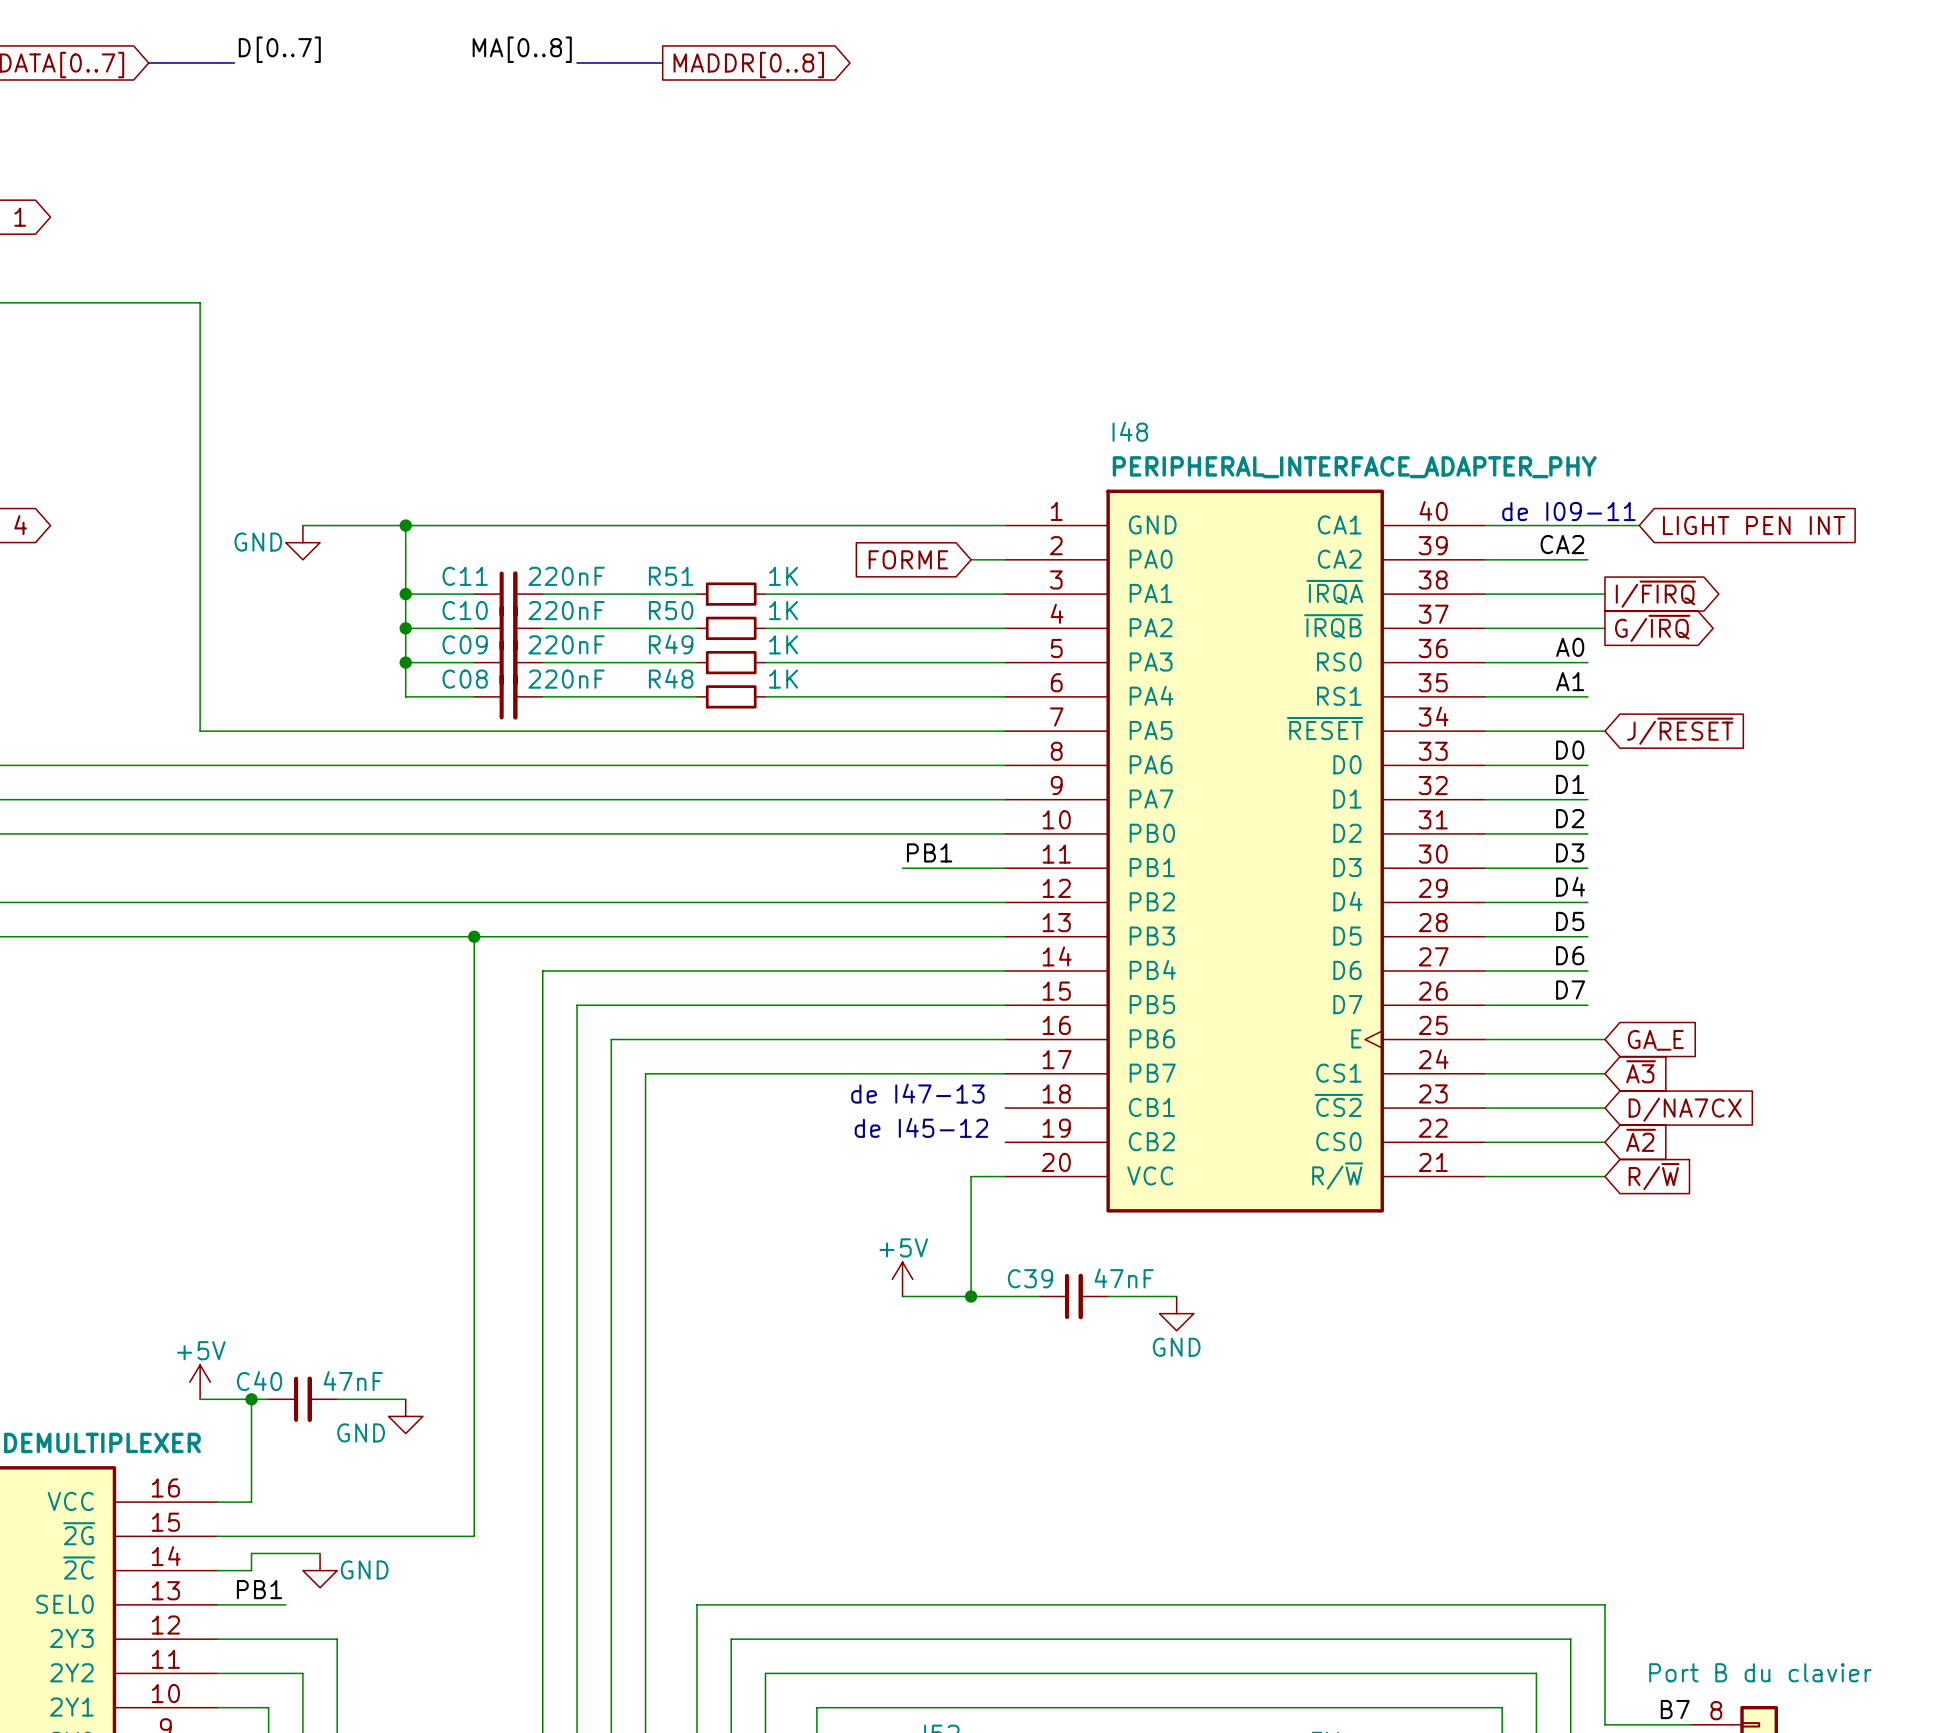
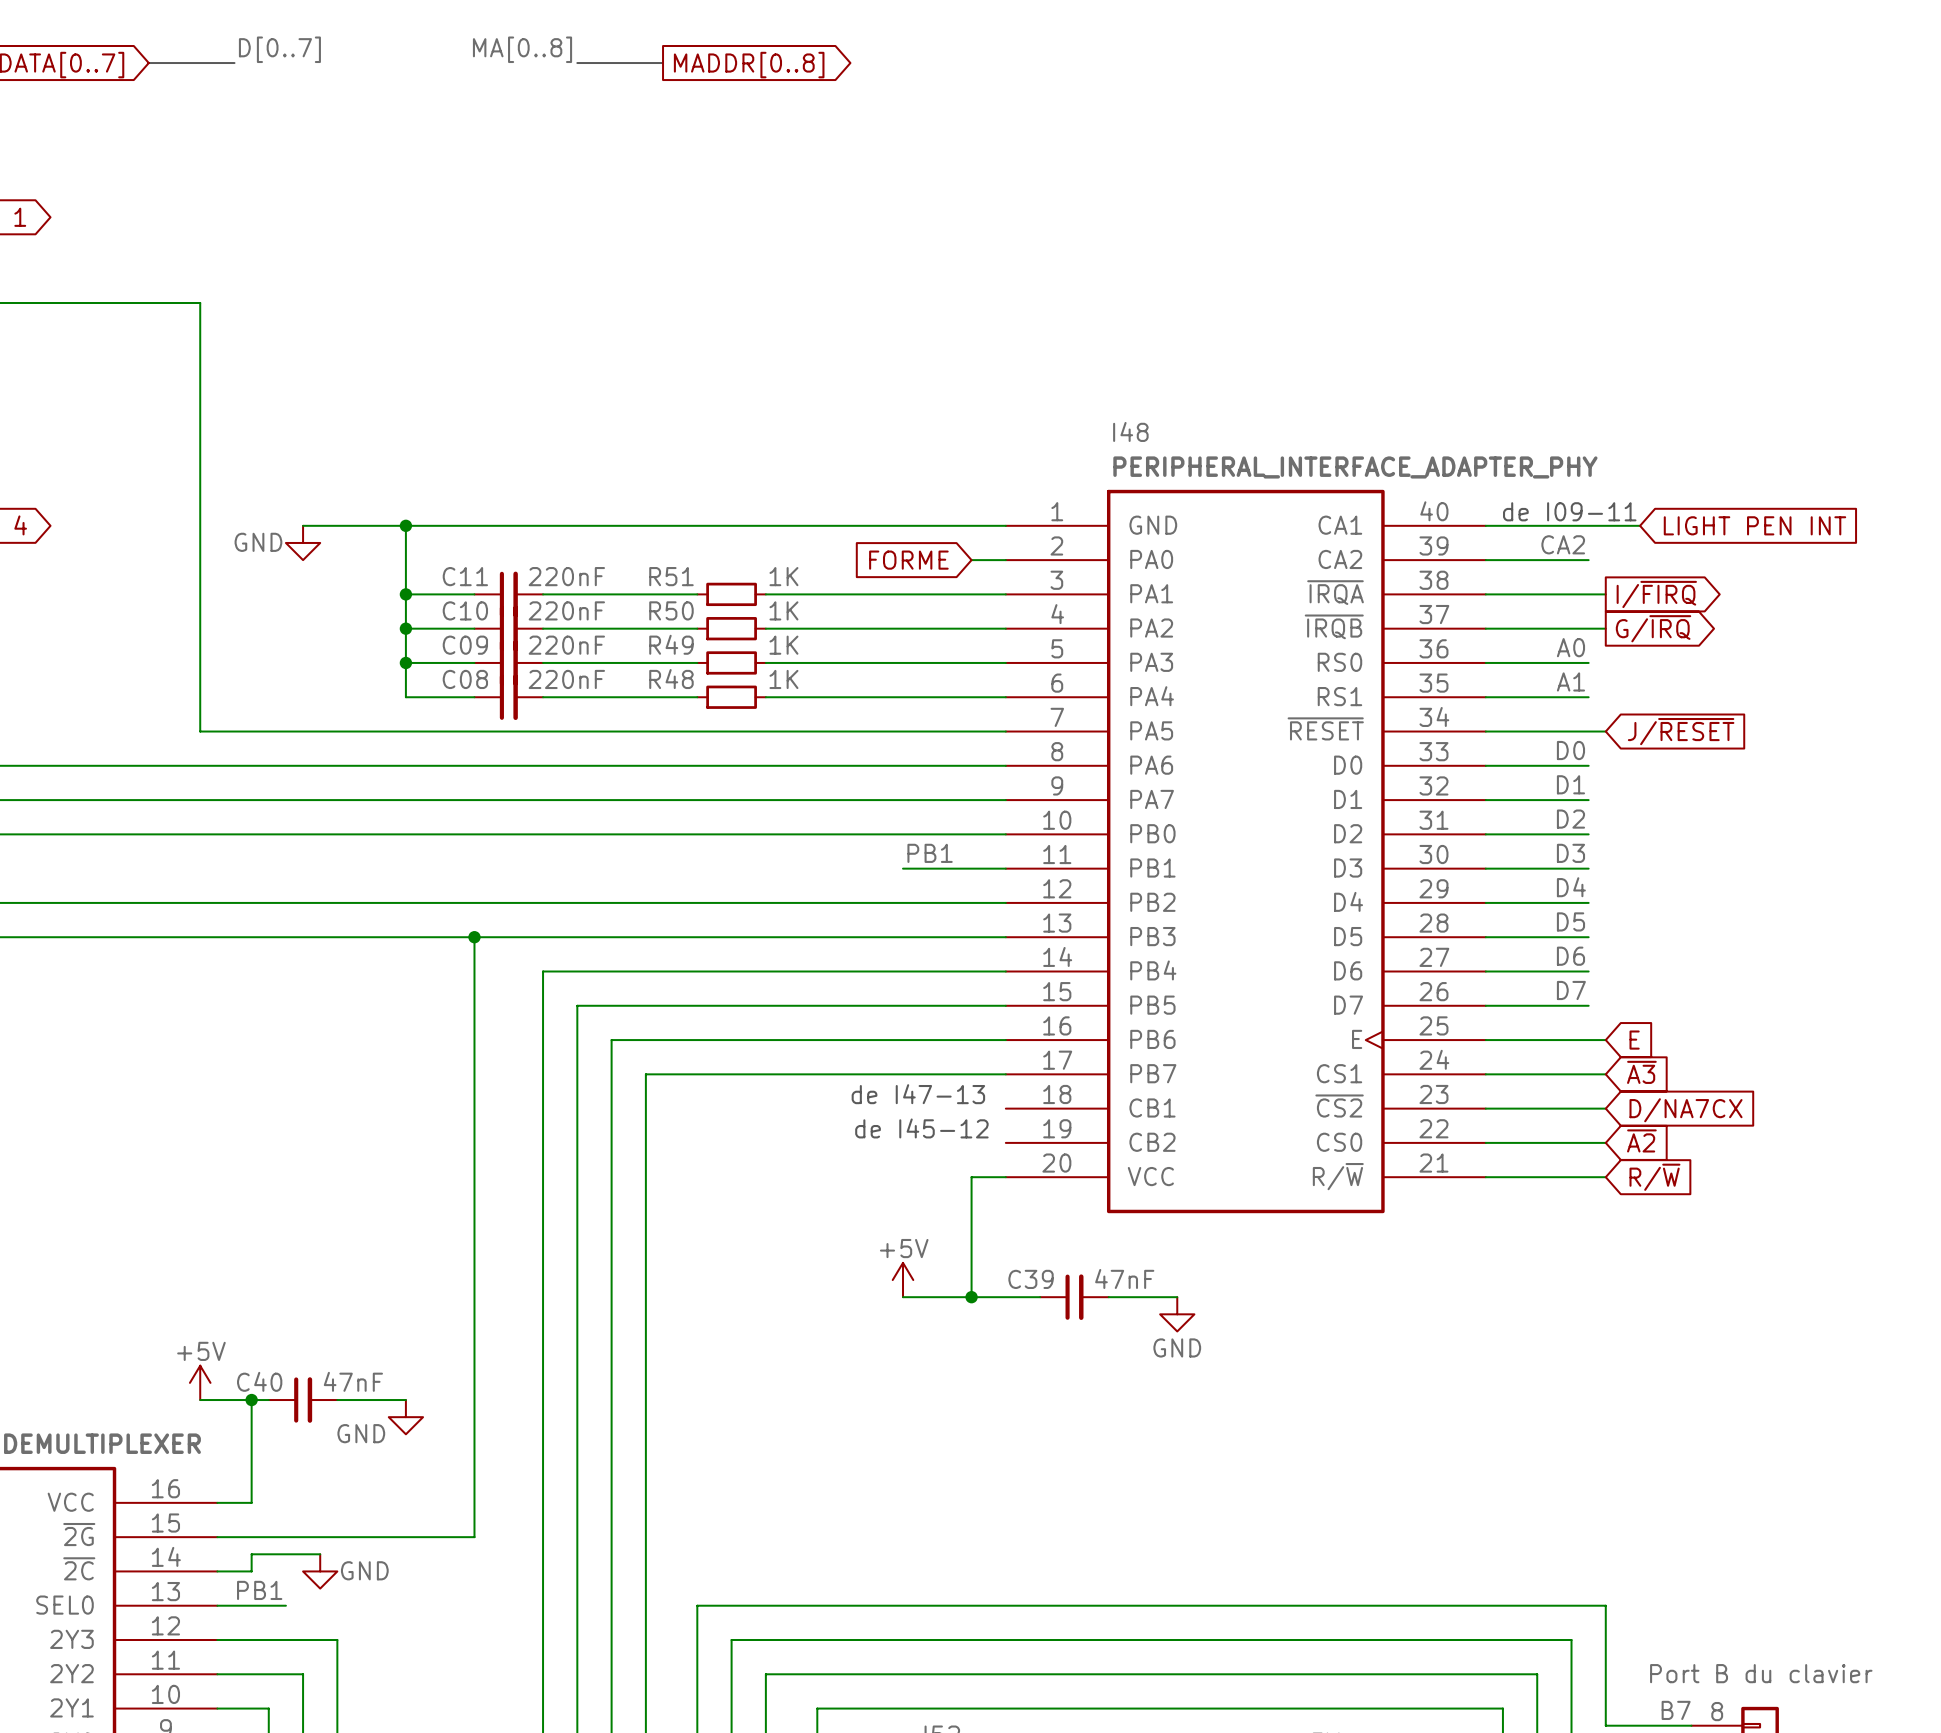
global label: GA_E (1655, 1040) -> E (1634, 1040)

